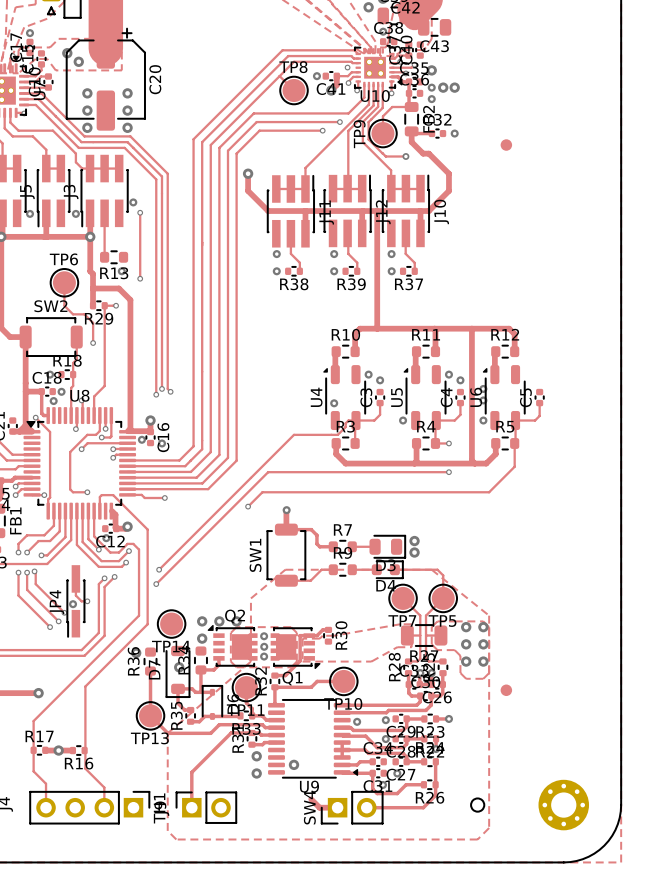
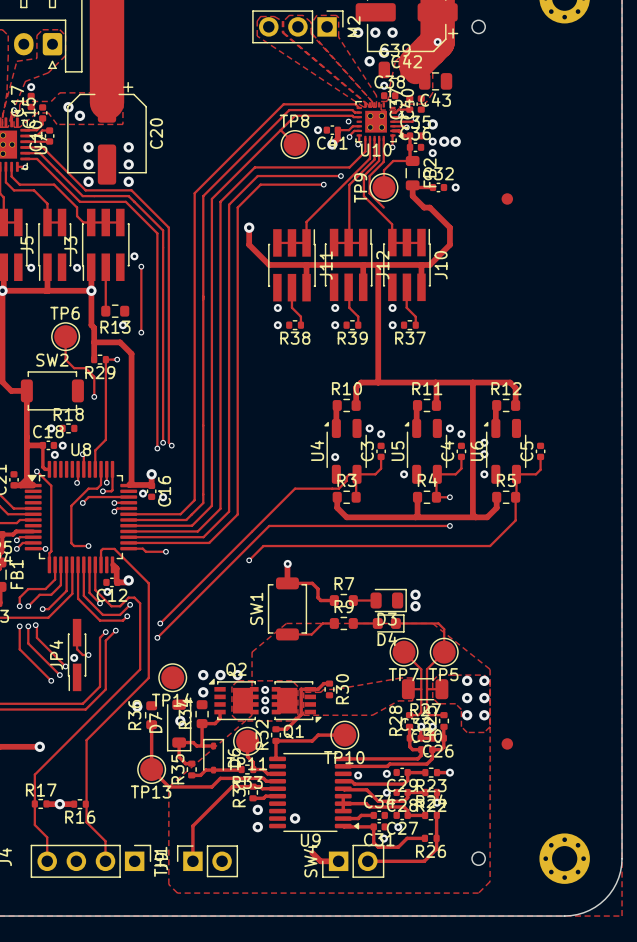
track: (382, 153) (385, 156) (405, 156) -> none
via: (405, 156) -> none
track: (76, 337) (76, 359) (73, 363) (73, 385) (71, 387) (71, 415) -> none

